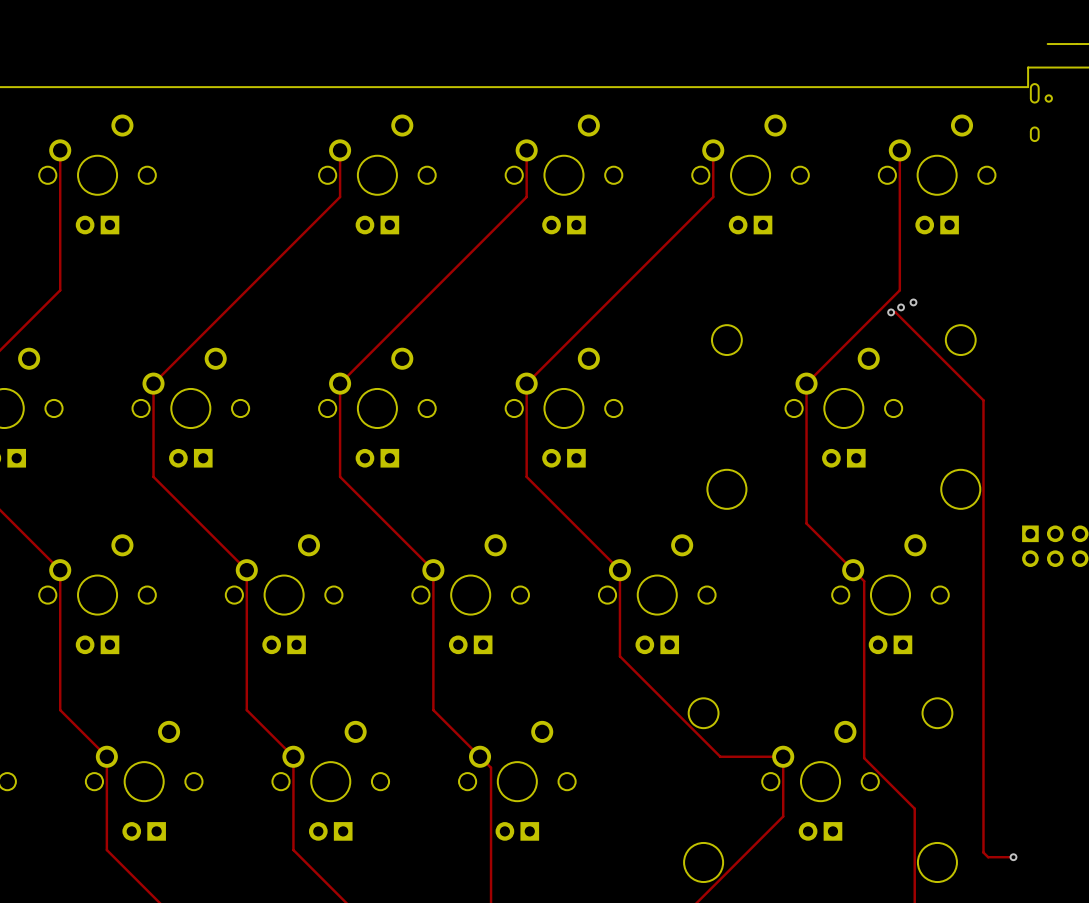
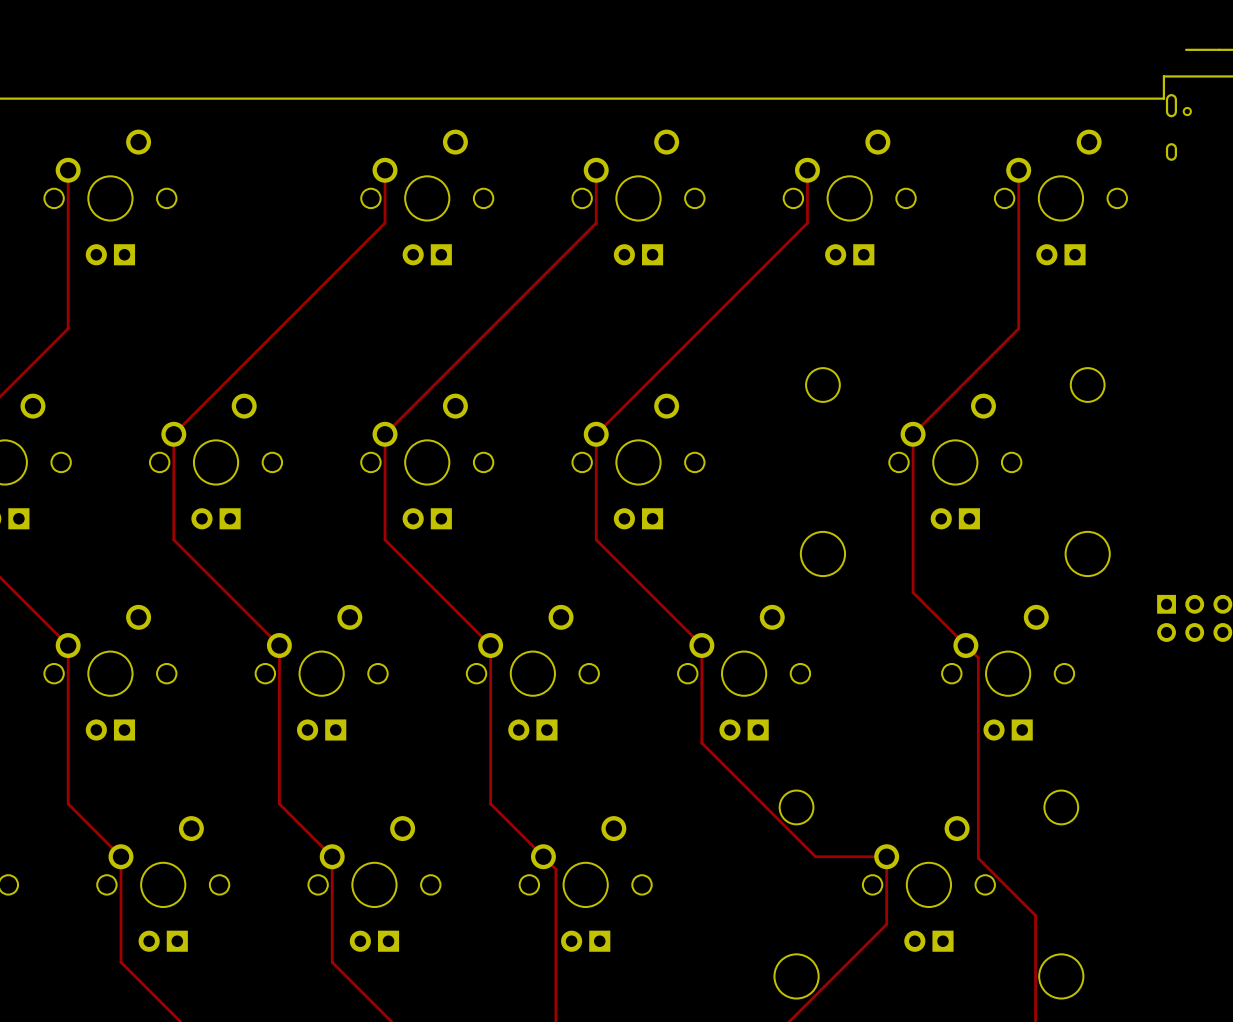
via: (913, 302) -> none
via: (901, 307) -> none
track: (891, 312) (895, 312) (983, 400) (983, 852) (988, 857) (1013, 857) -> none
via: (891, 312) -> none
via: (1013, 857) -> none

